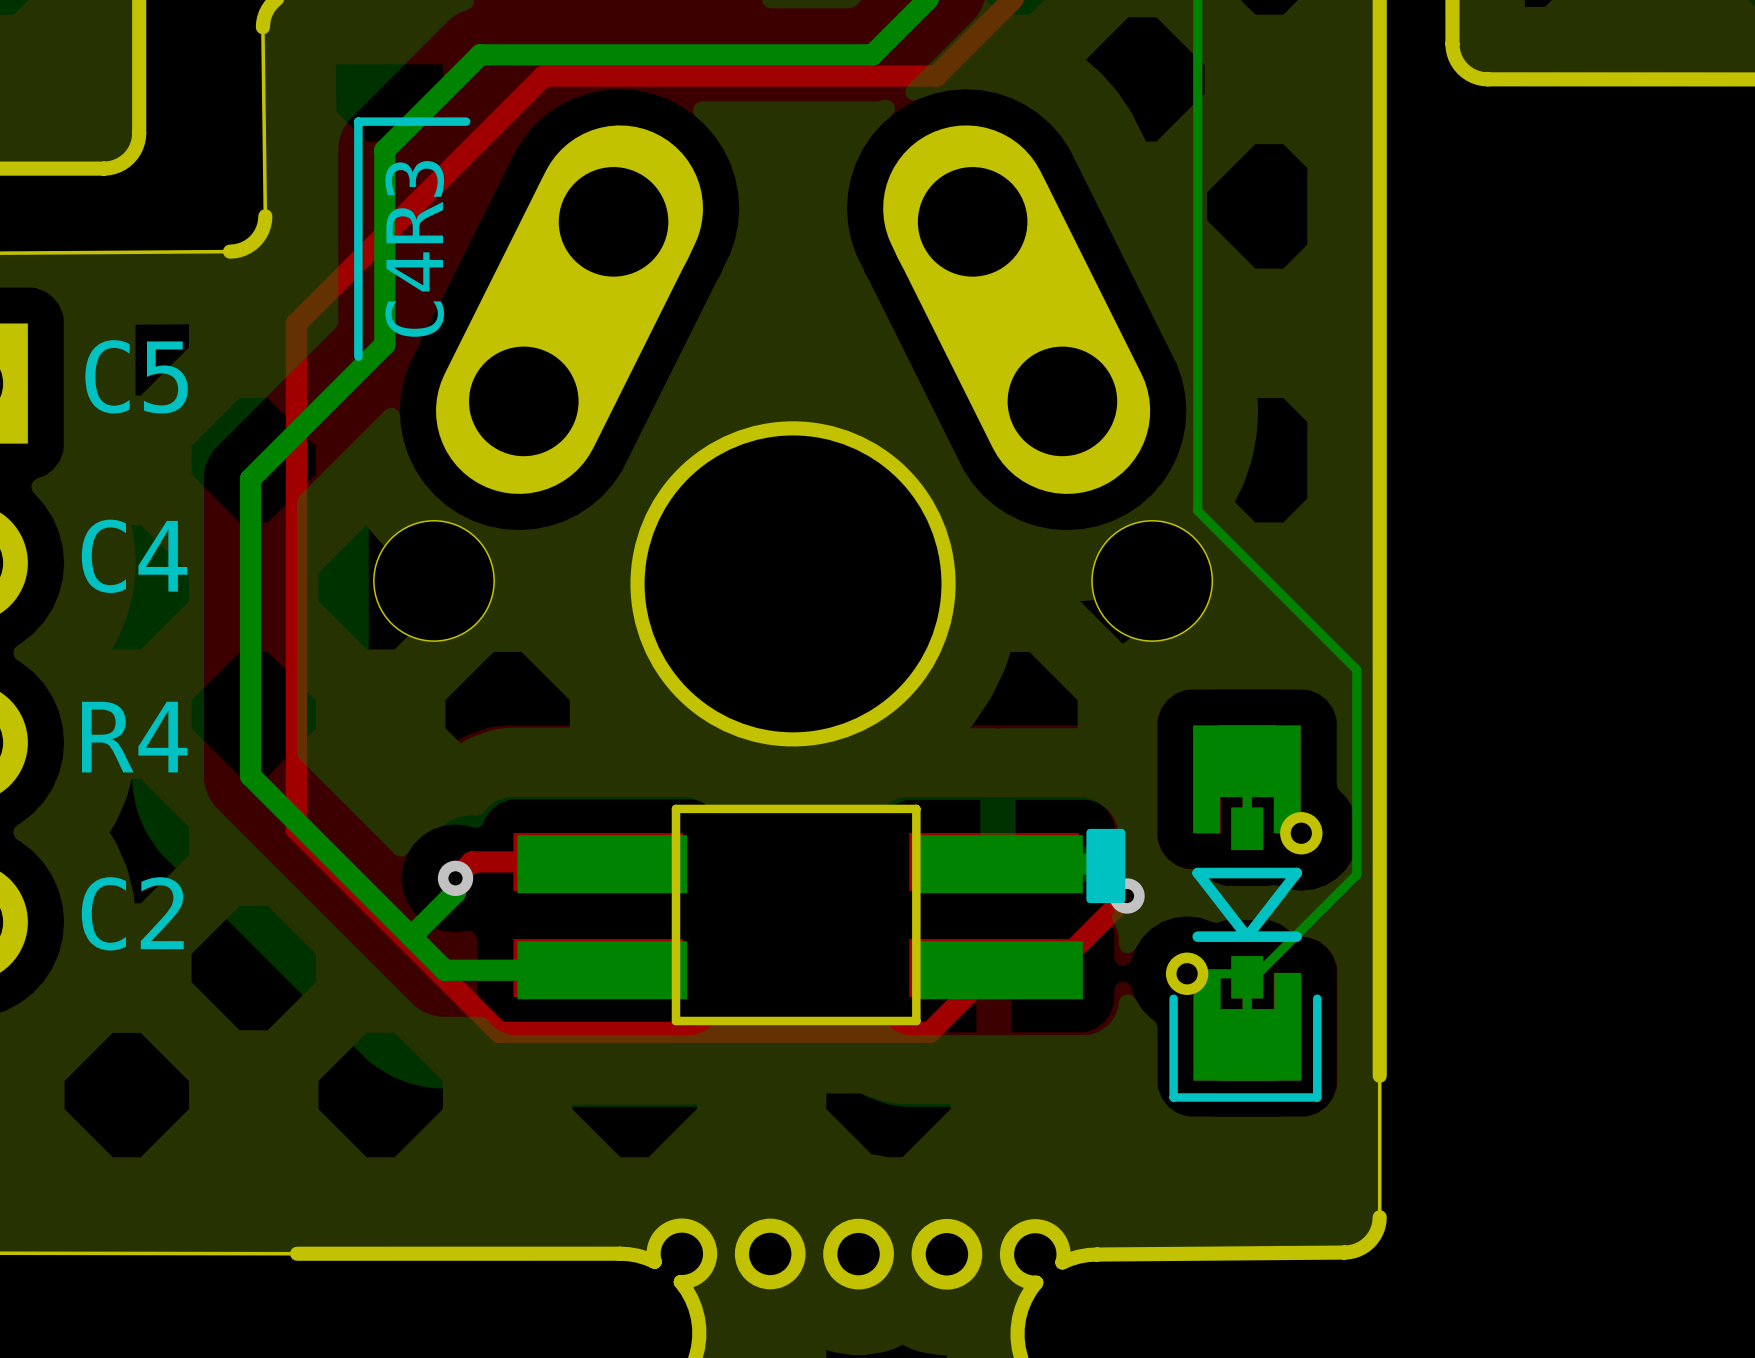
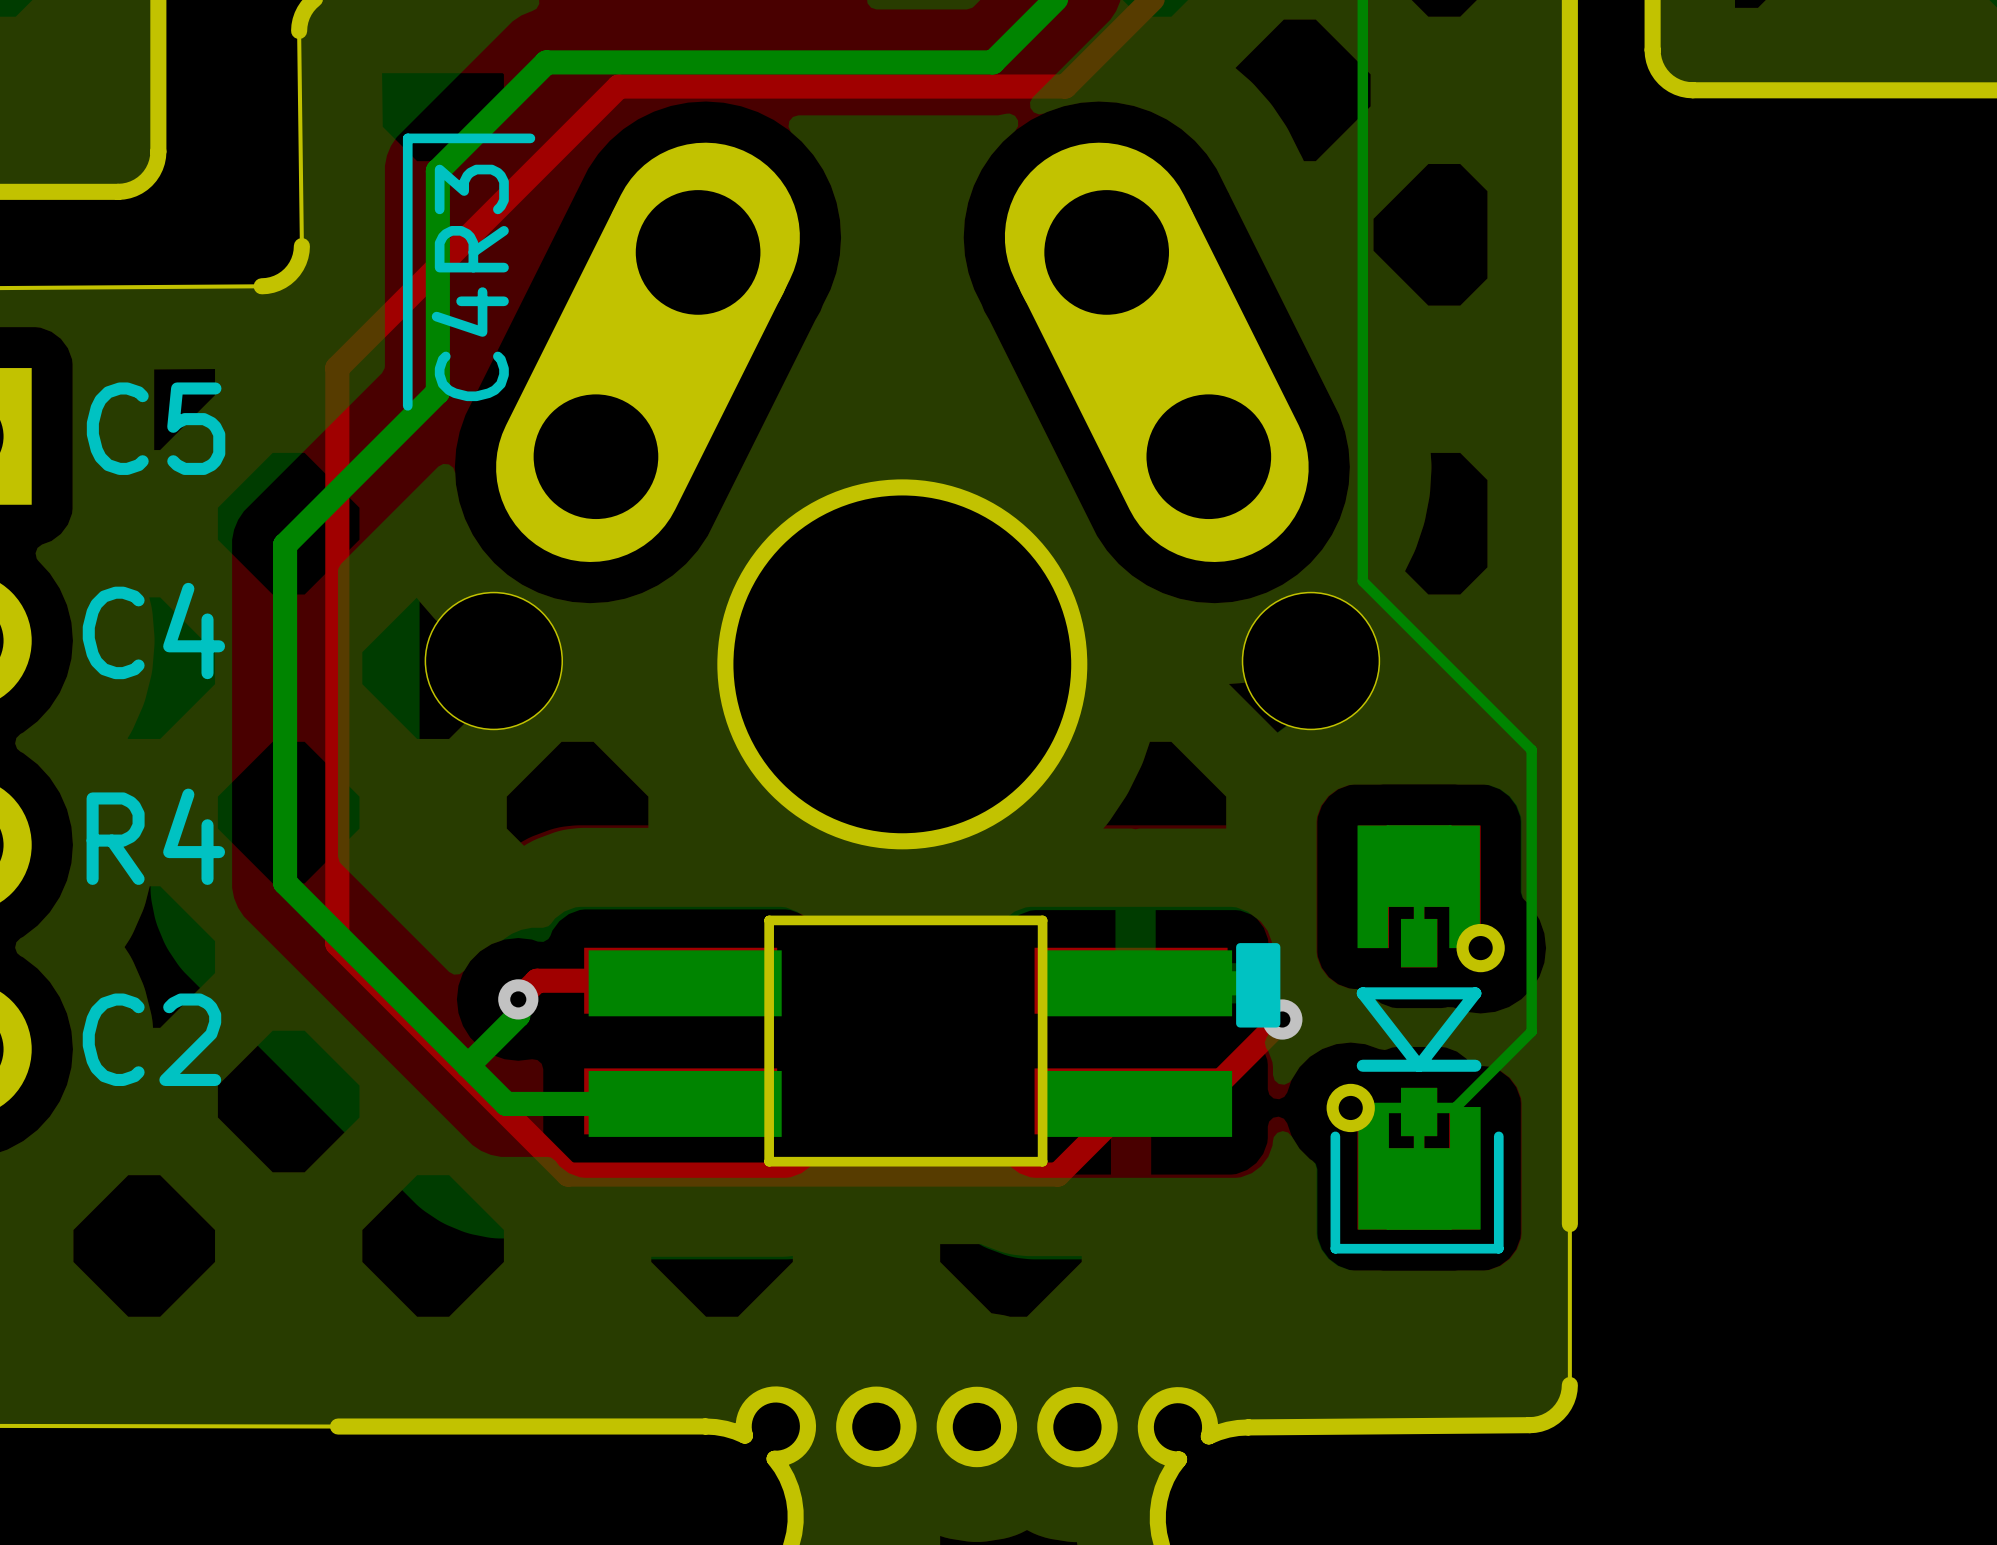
bottom track: (1346, 659) (1356, 669) (1356, 874) (1257, 973) -> (1531, 750) (1531, 1031) (1455, 1107) (1431, 1107)

